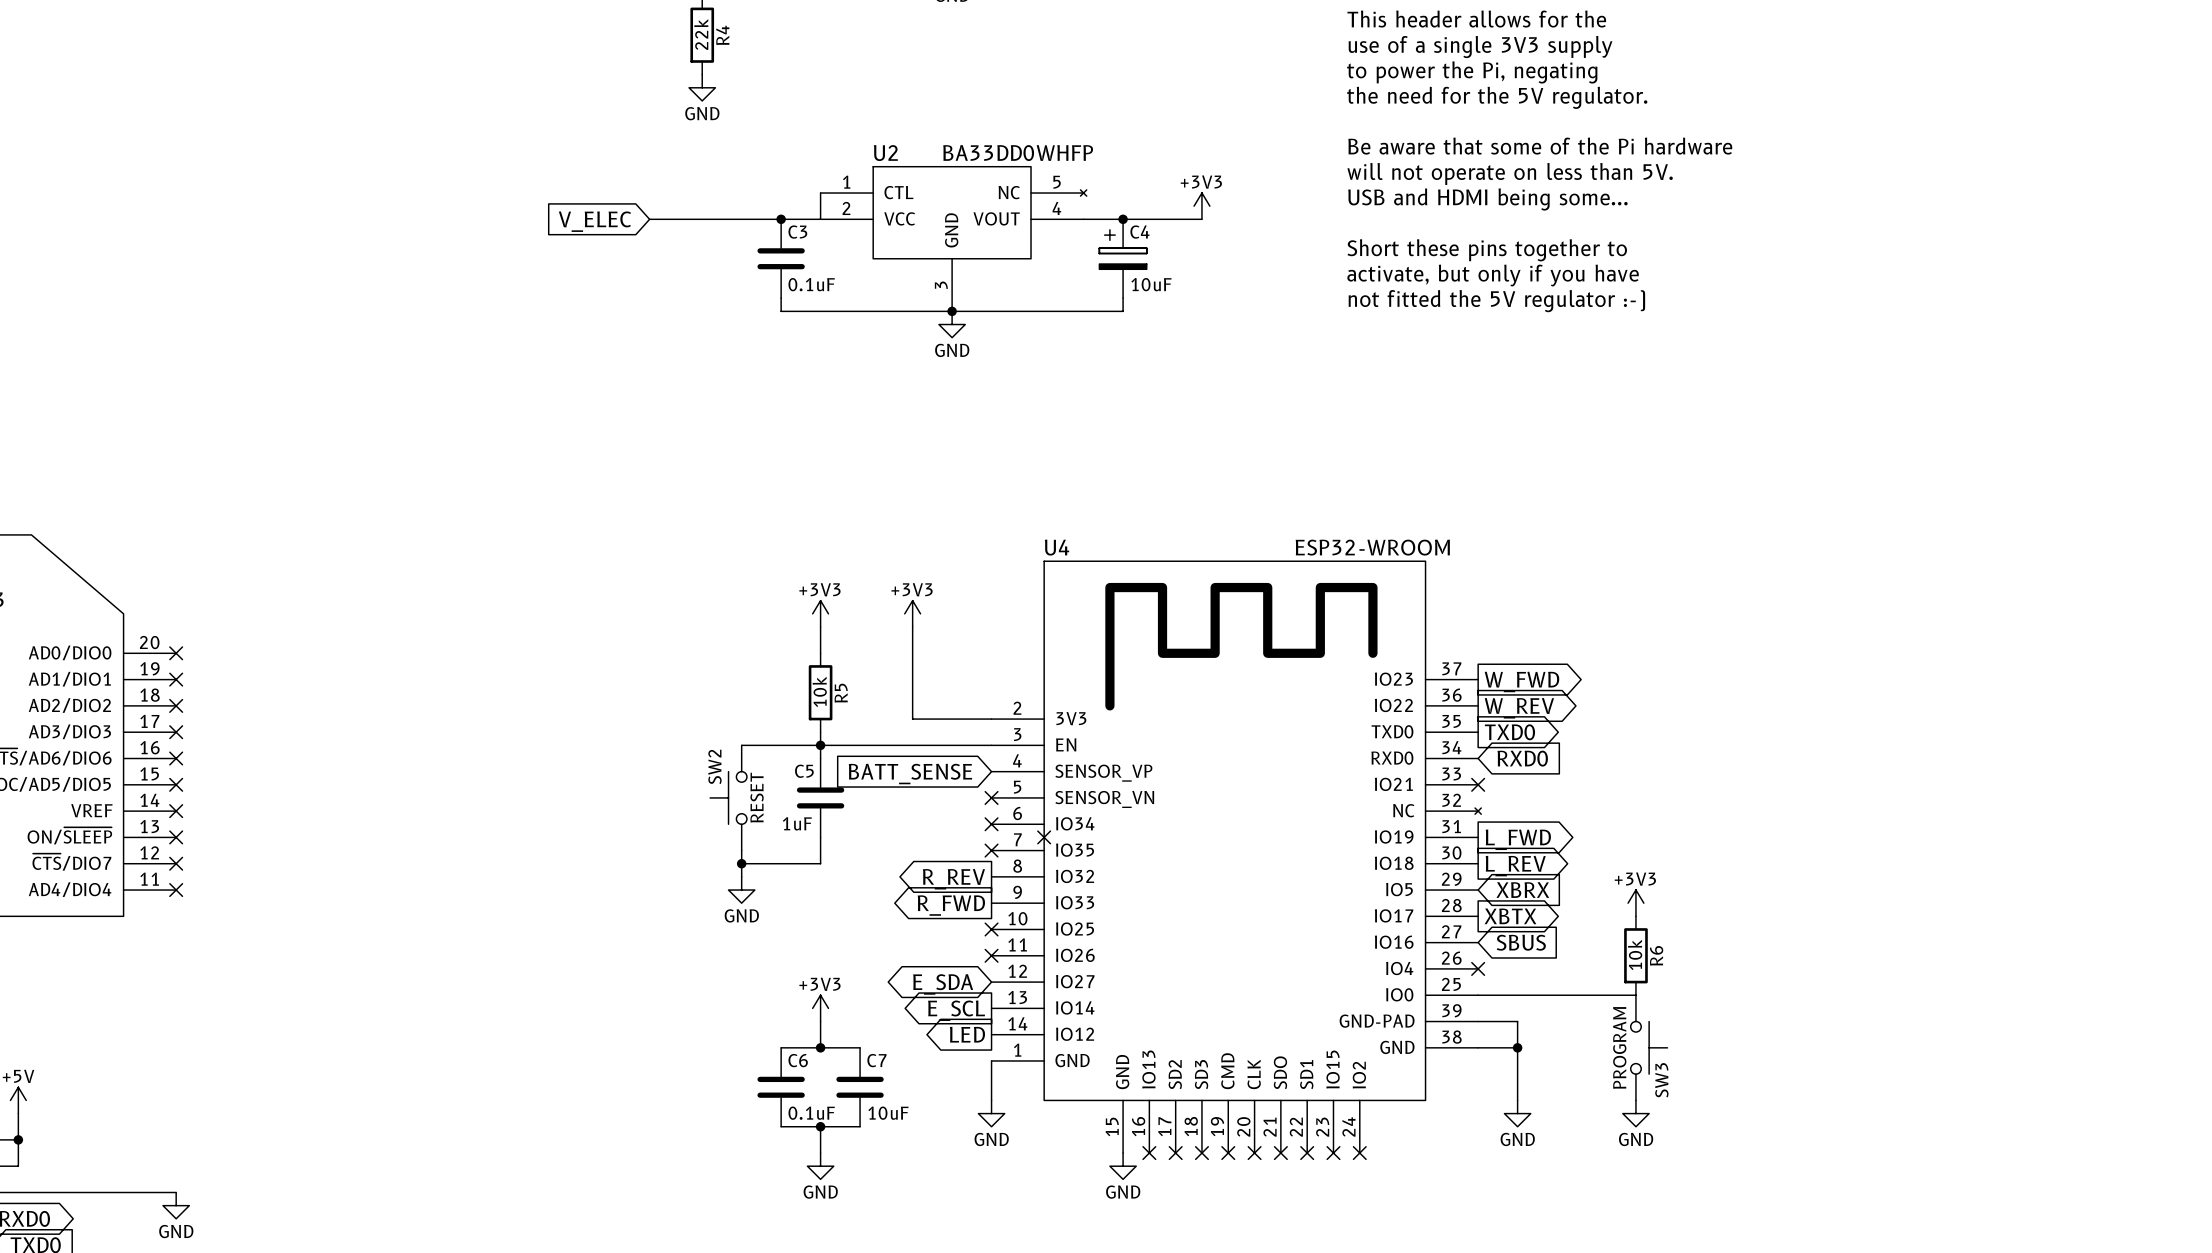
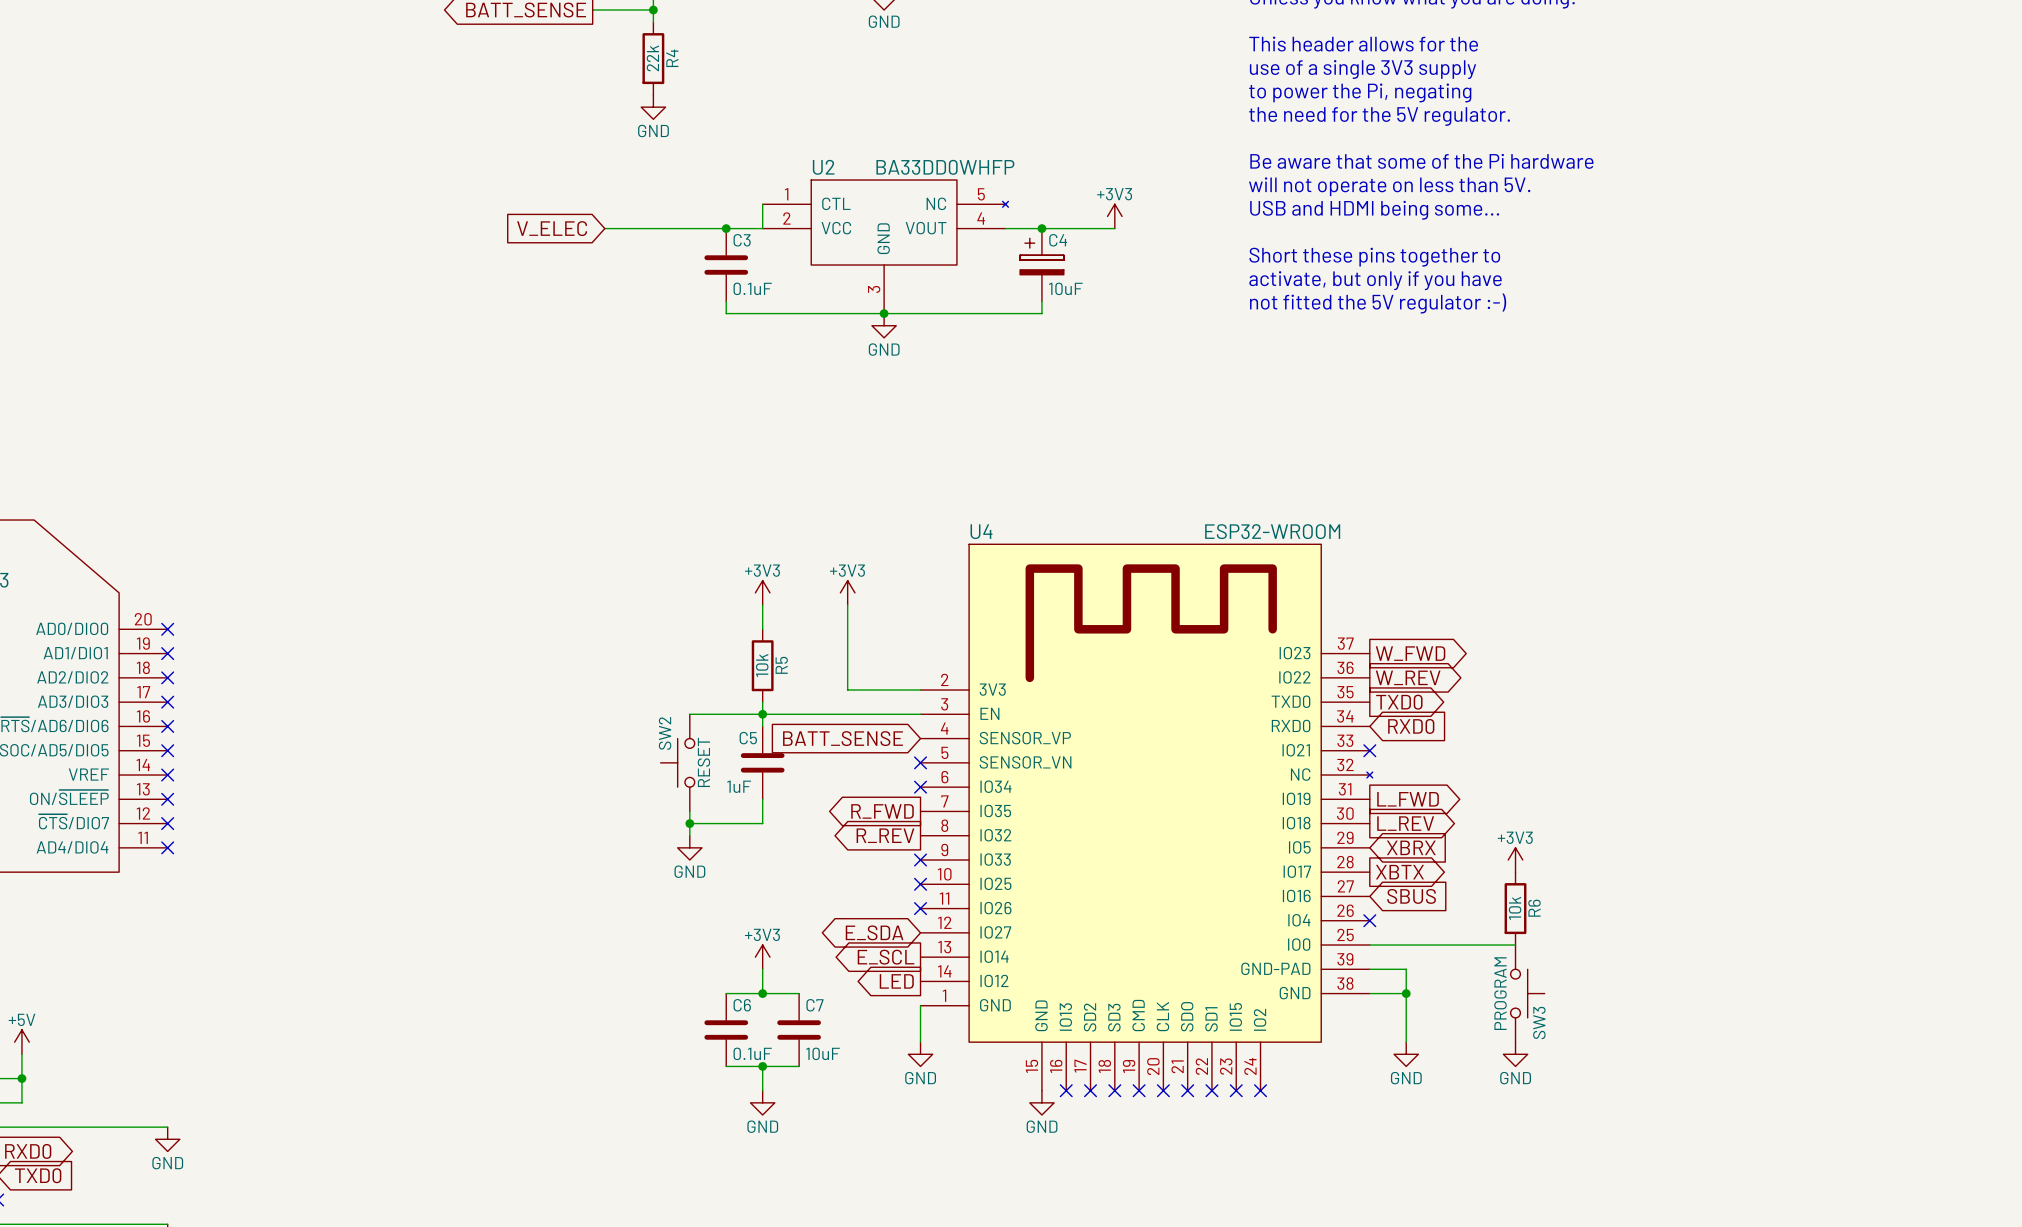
no-connect mark: (1044, 837) -> none
no-connect mark: (991, 850) -> none
no-connect mark: none -> (920, 860)
global label position: R_FWD (951, 905) -> R_FWD (882, 811)

